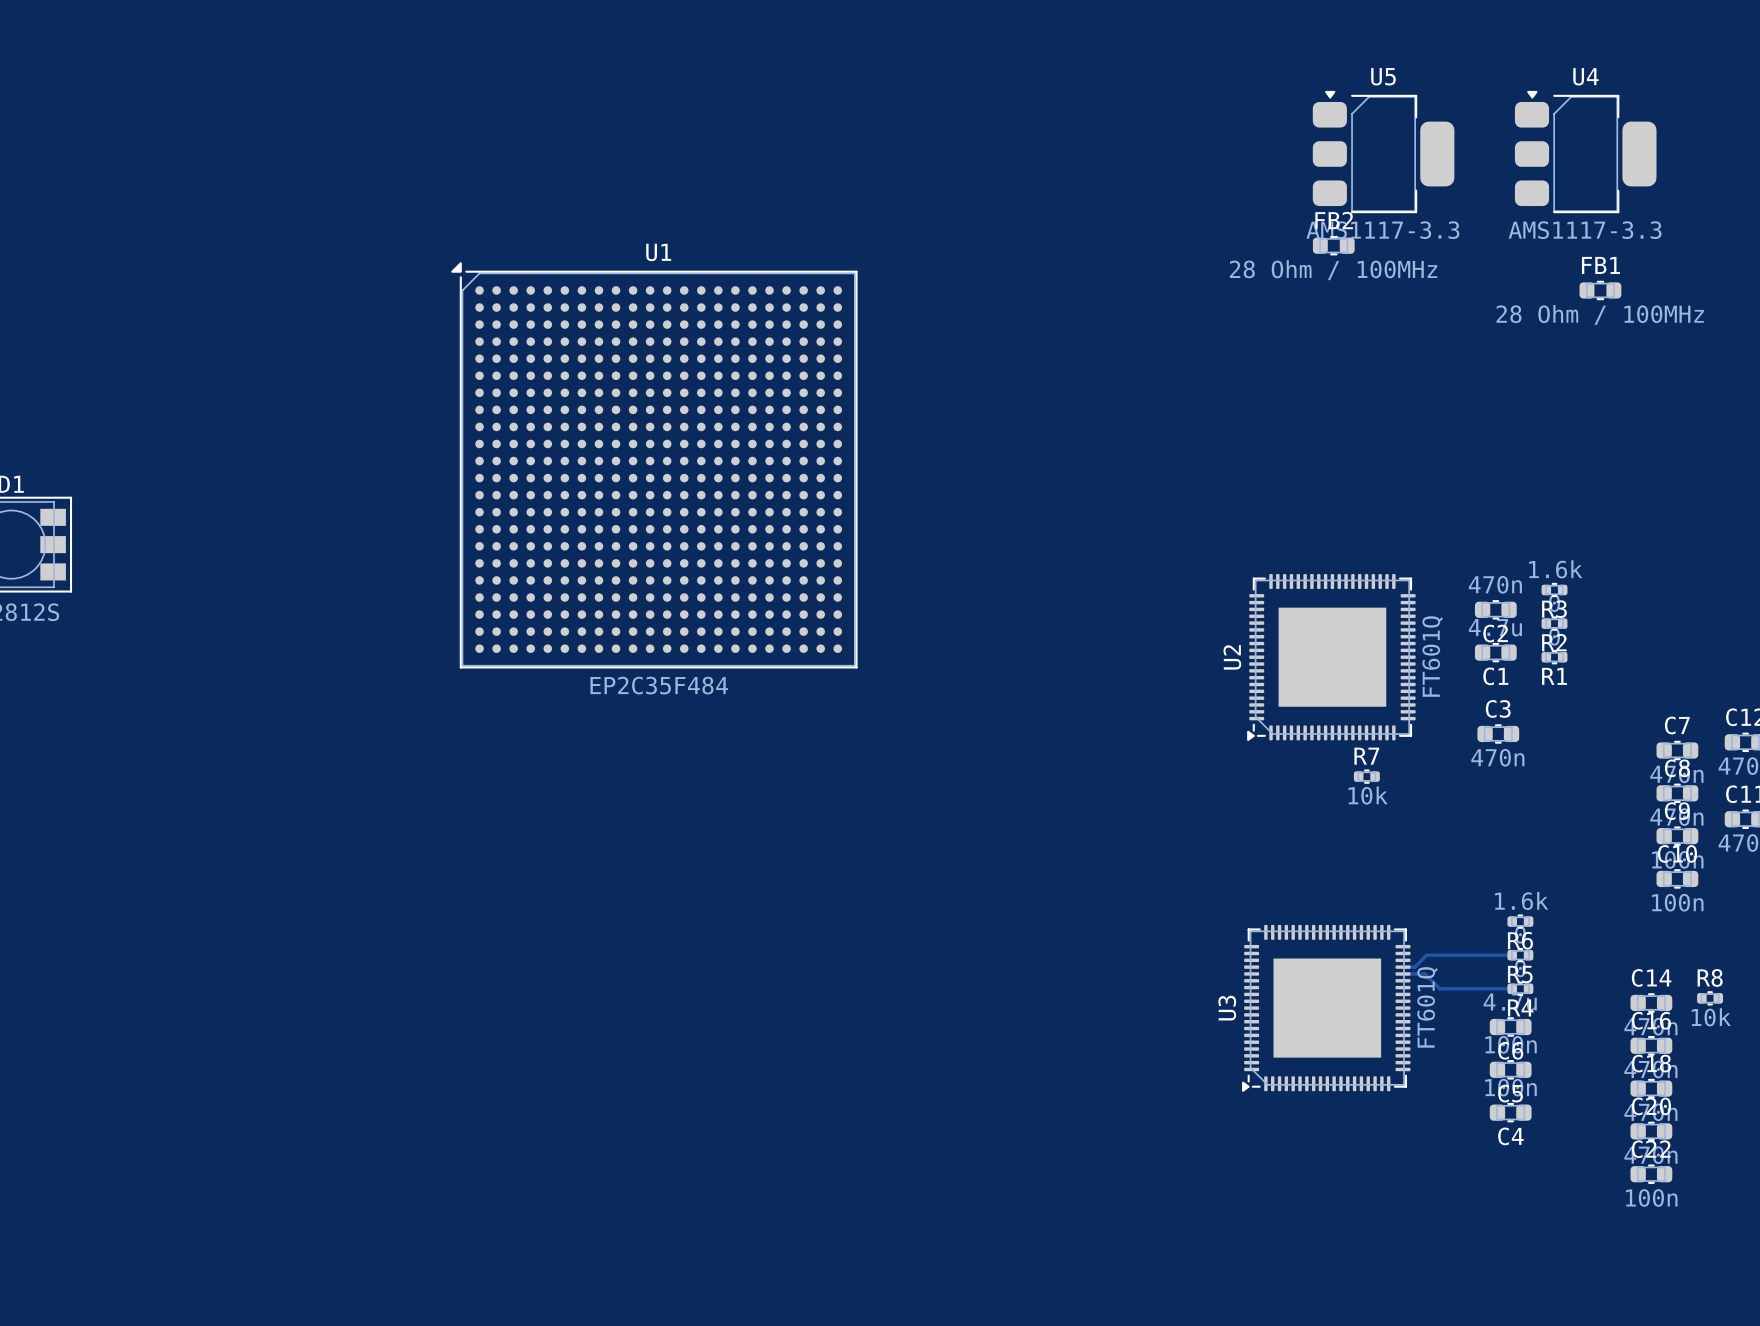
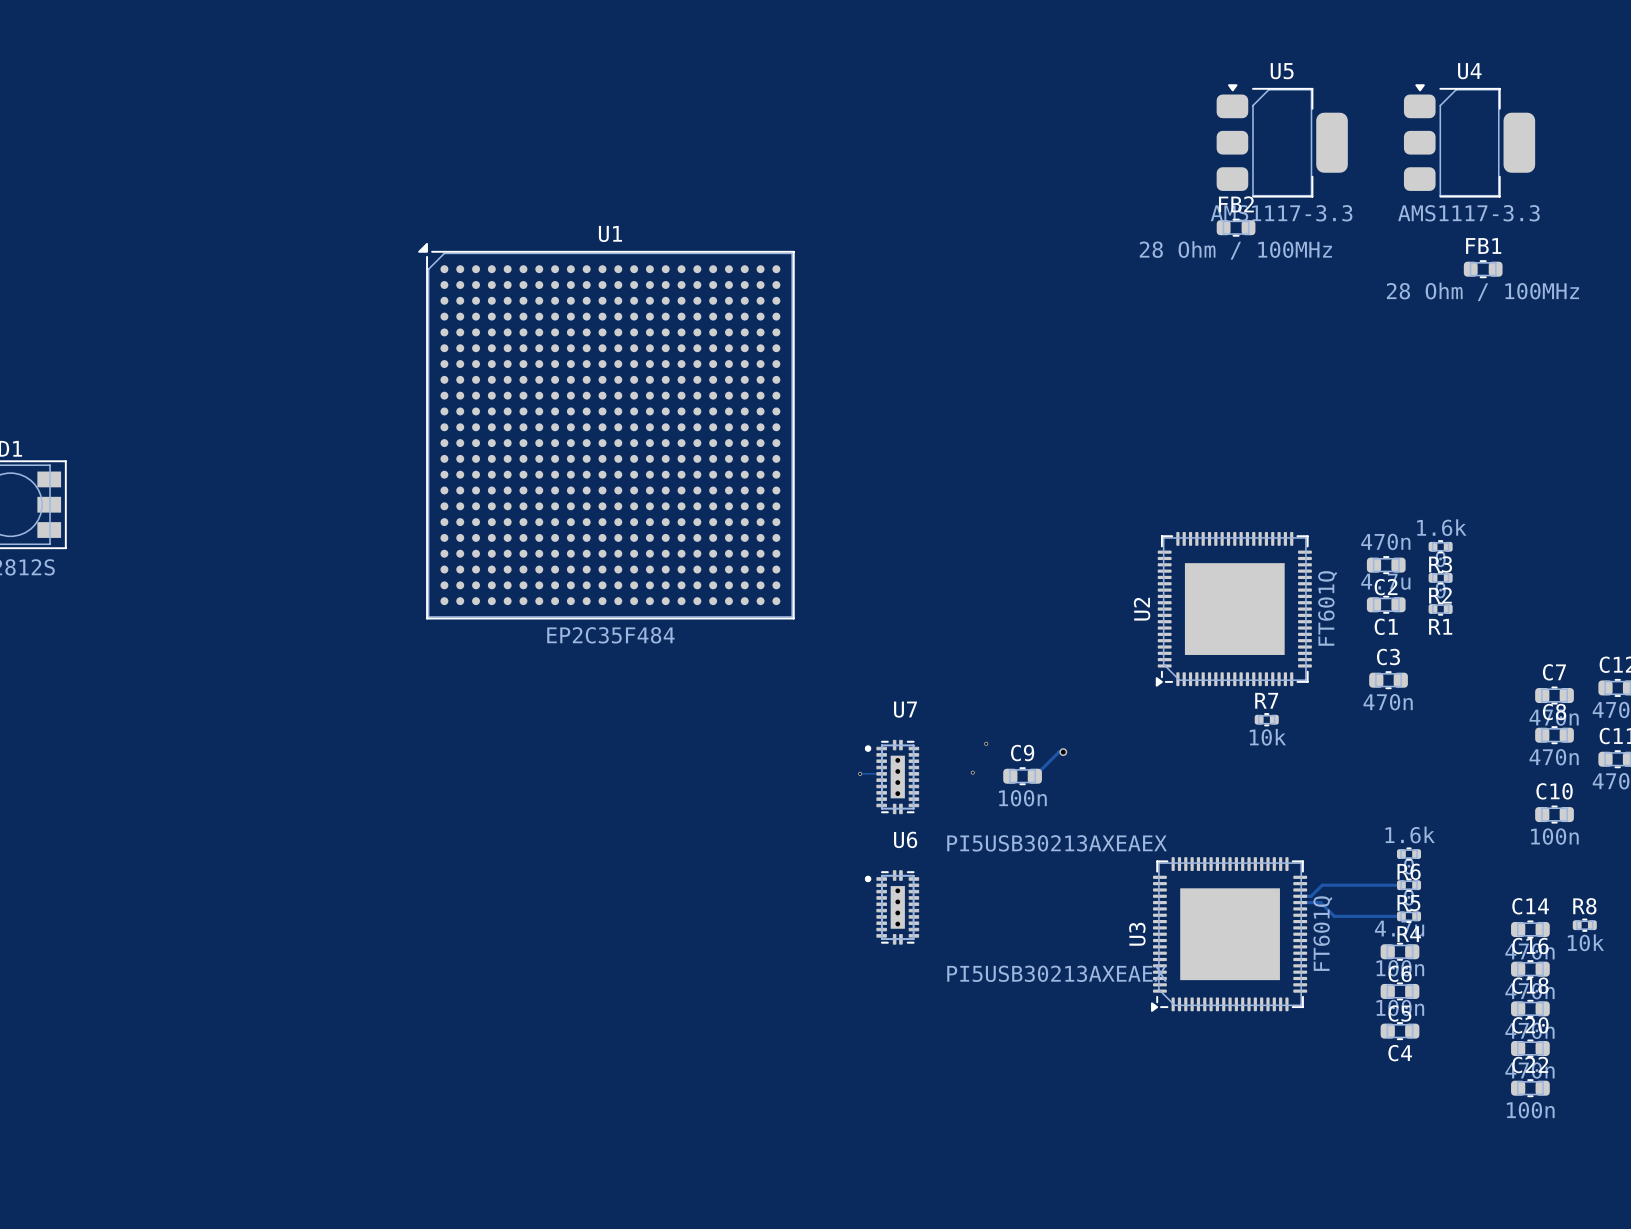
via: none -> (986, 743)
track: none -> (1063, 752) (1058, 752) (1034, 776)
via: none -> (1063, 752)
via: none -> (972, 772)
track: none -> (860, 773) (881, 773)
via: none -> (860, 773)
C9 position: (1677, 836) -> (1022, 776)
U7: none -> PI5USB30213AXEAEX (892, 777)
U6: none -> PI5USB30213AXEAEX (892, 907)

